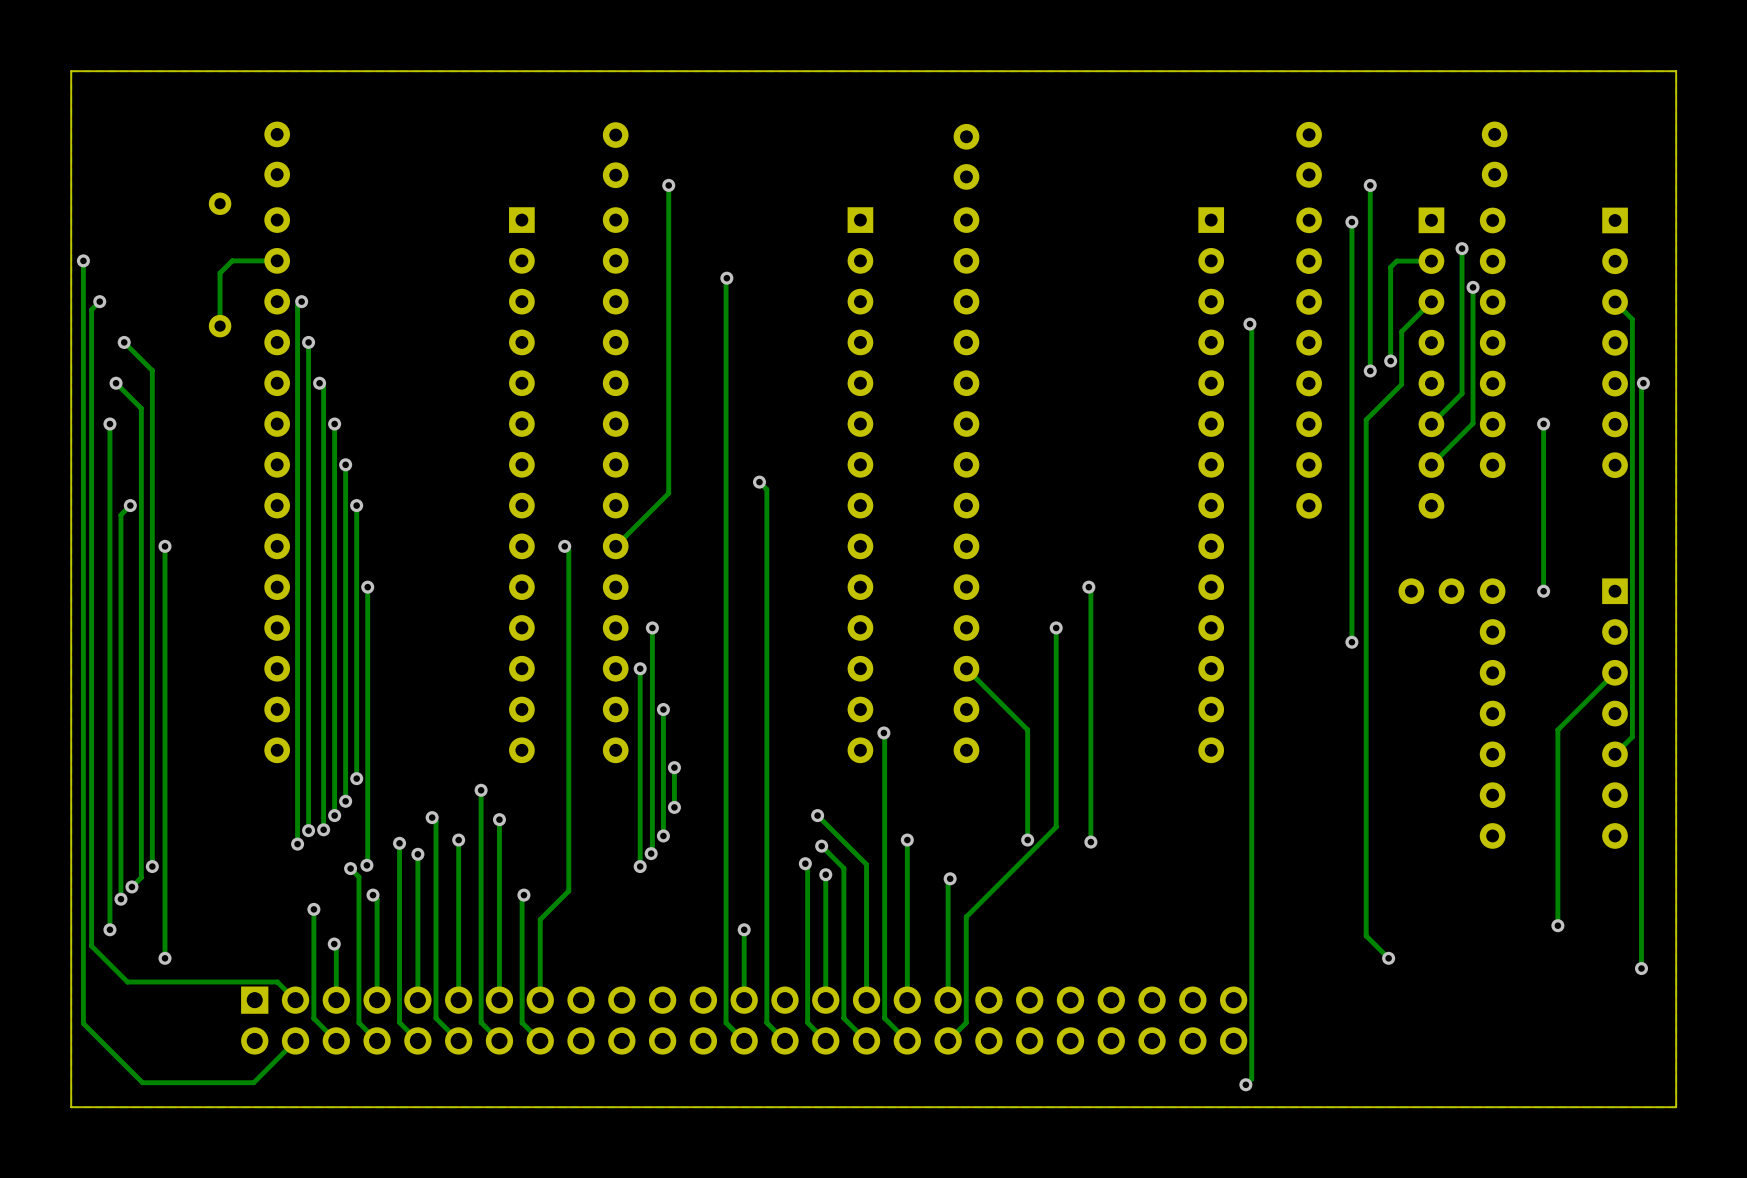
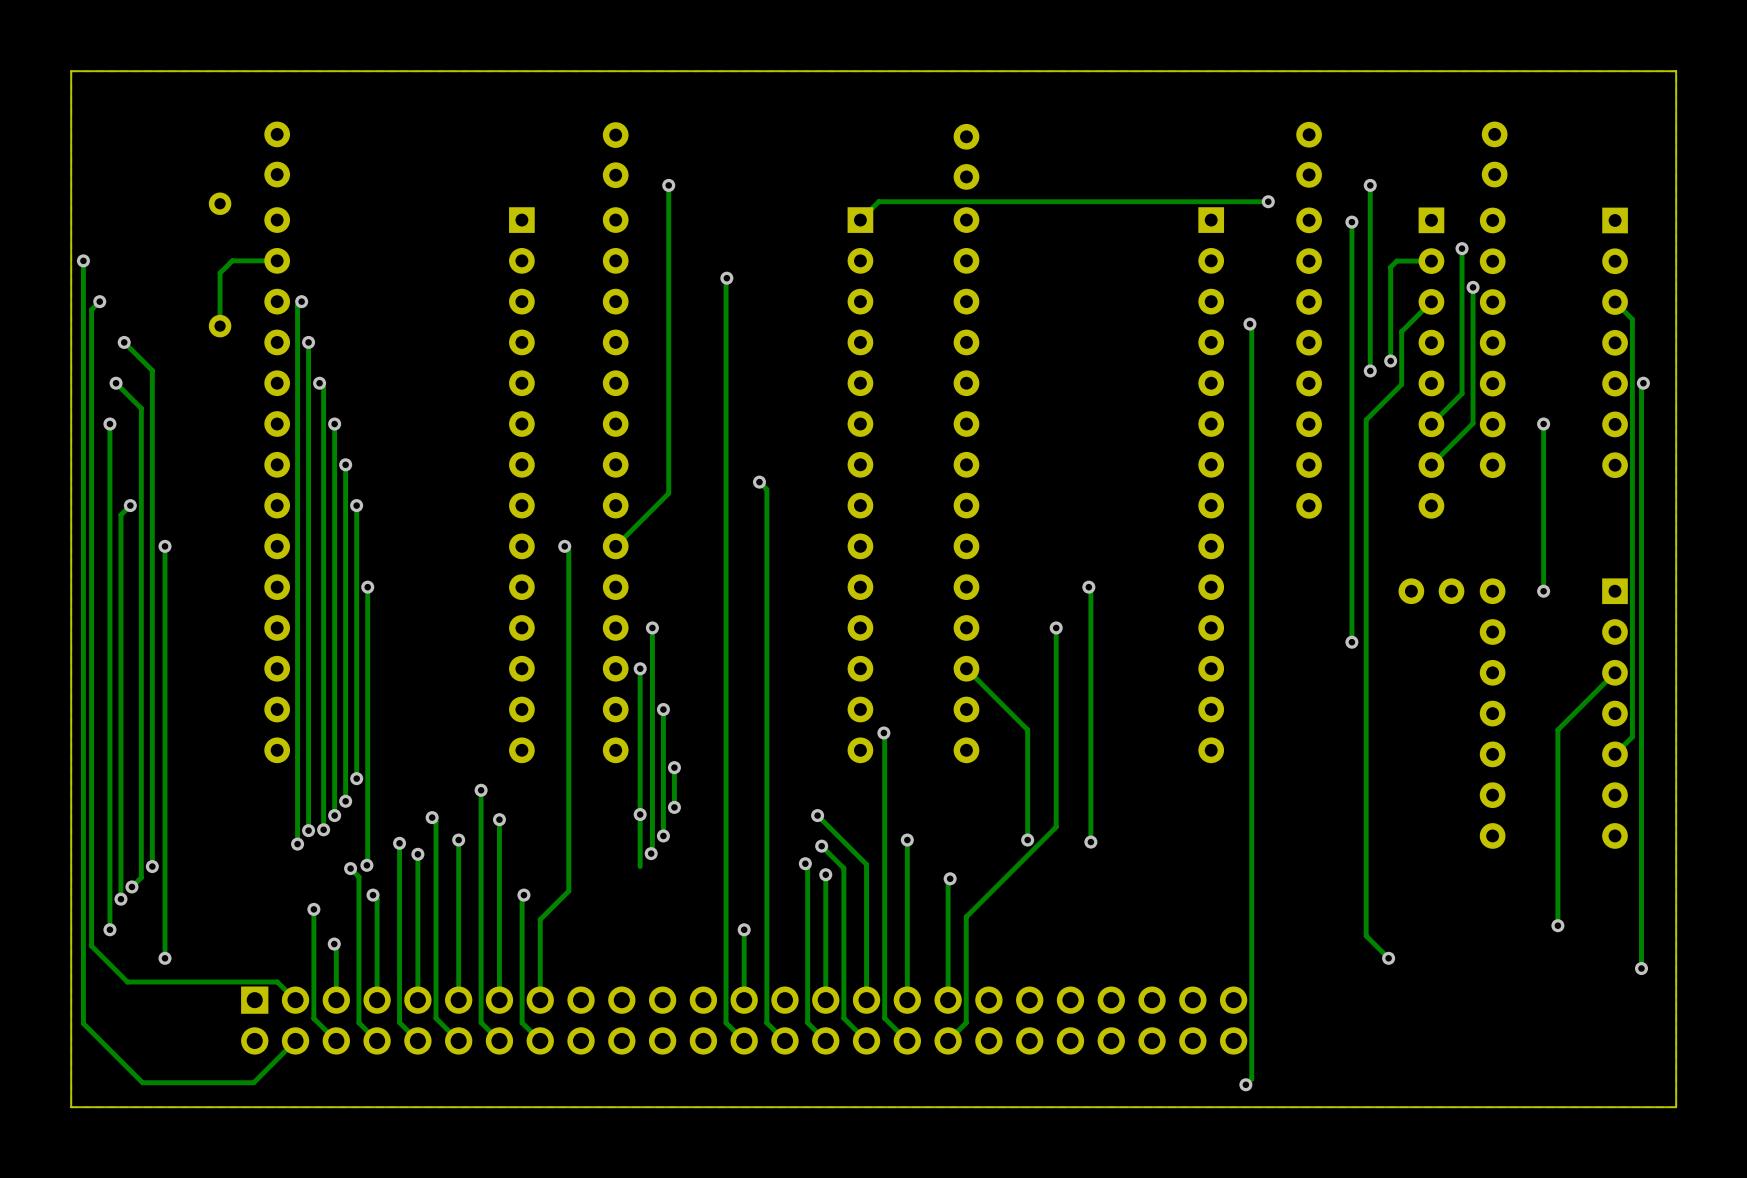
track: none -> (1268, 201) (878, 201) (860, 220)
via: none -> (1268, 201)
via position: (640, 866) -> (640, 814)

